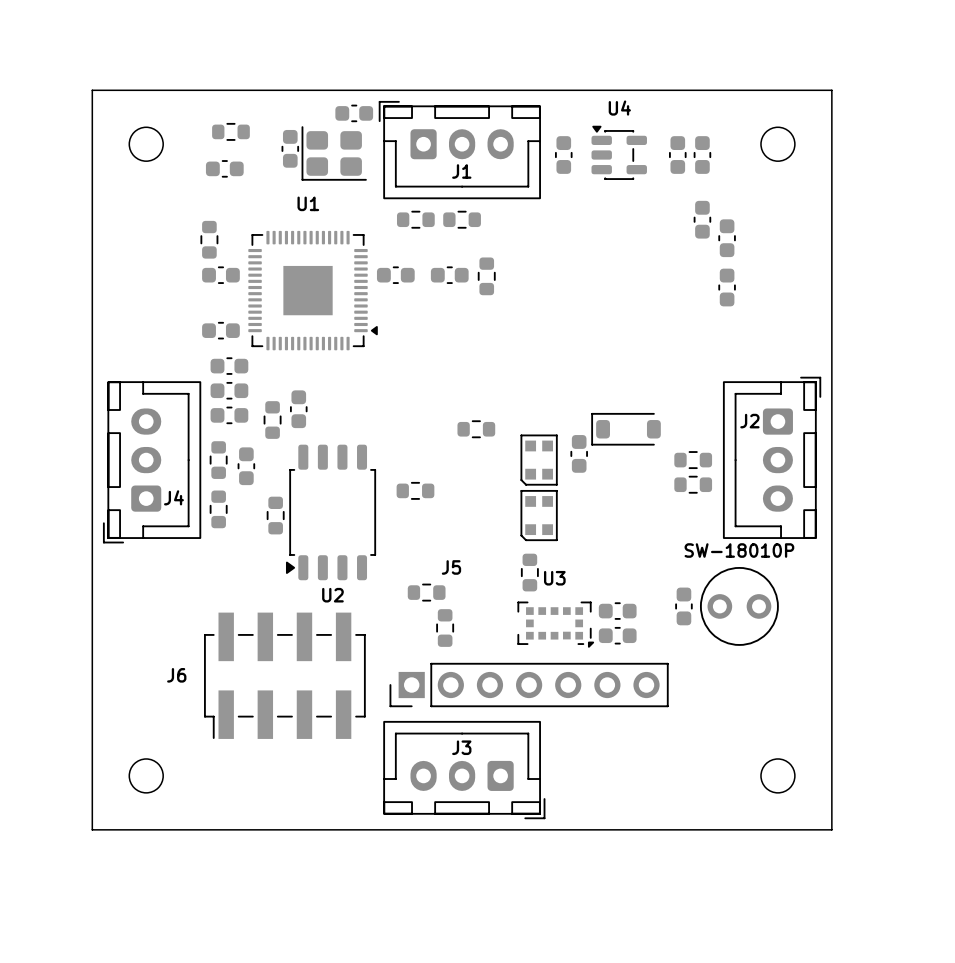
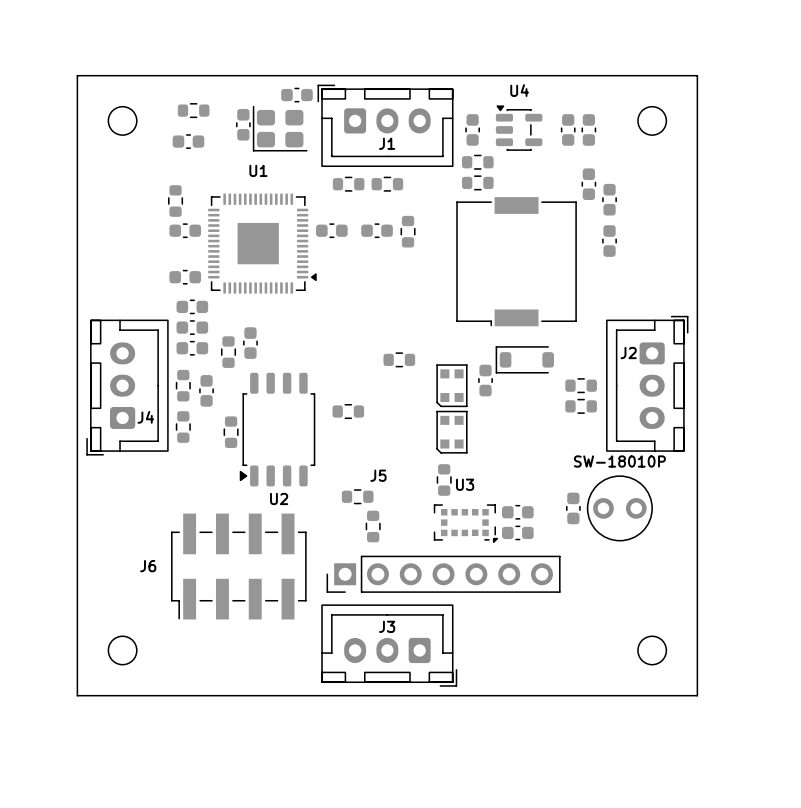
part: none -> (477, 162)
part: none -> (477, 182)
part: none -> (516, 261)

